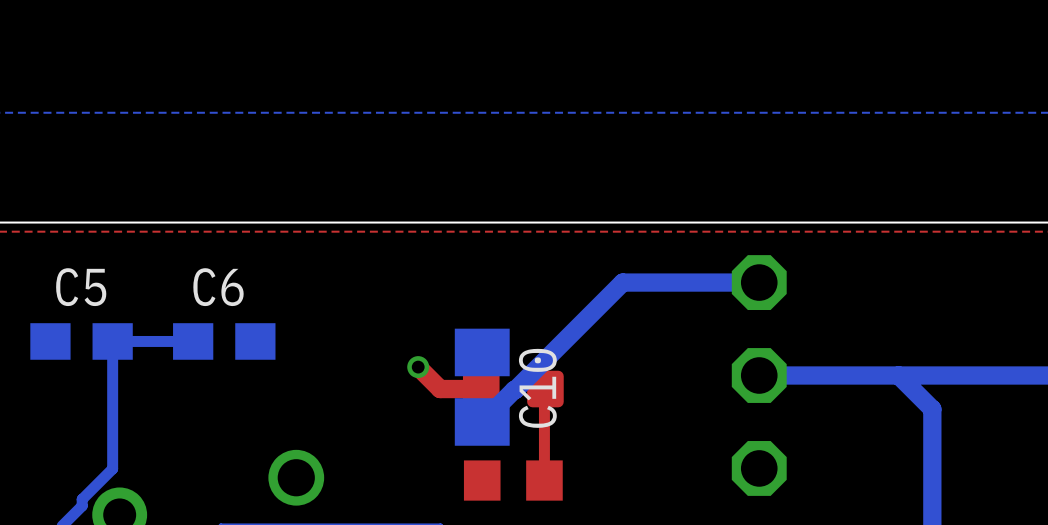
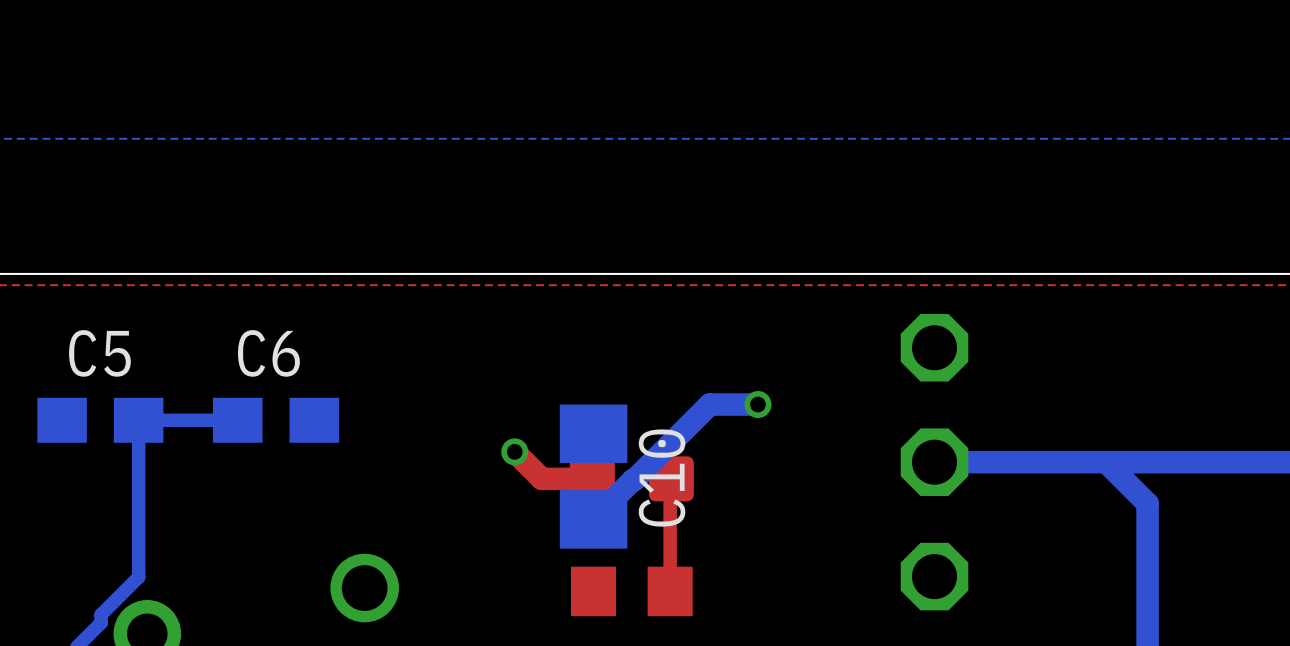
bottom track: (759, 282) (622, 282) (576, 328) -> (757, 404) (709, 404)
via: none -> (757, 404)

